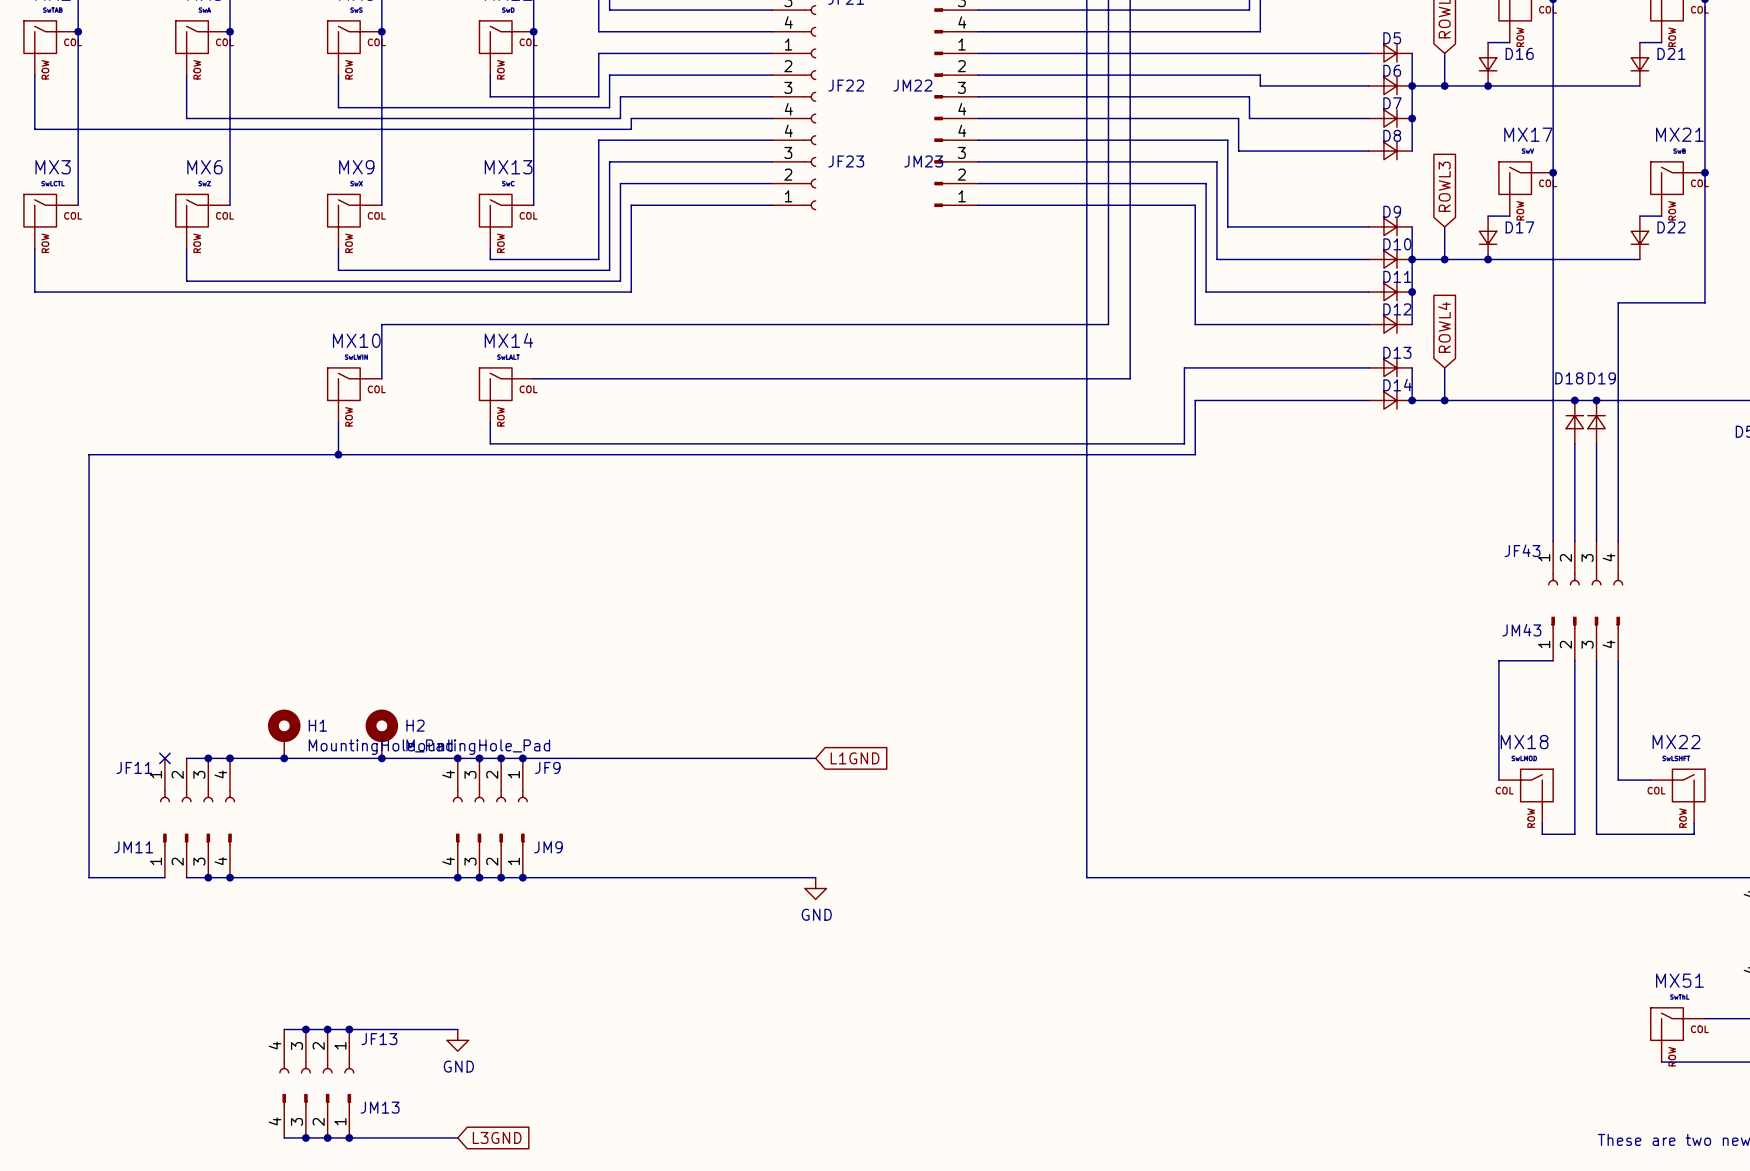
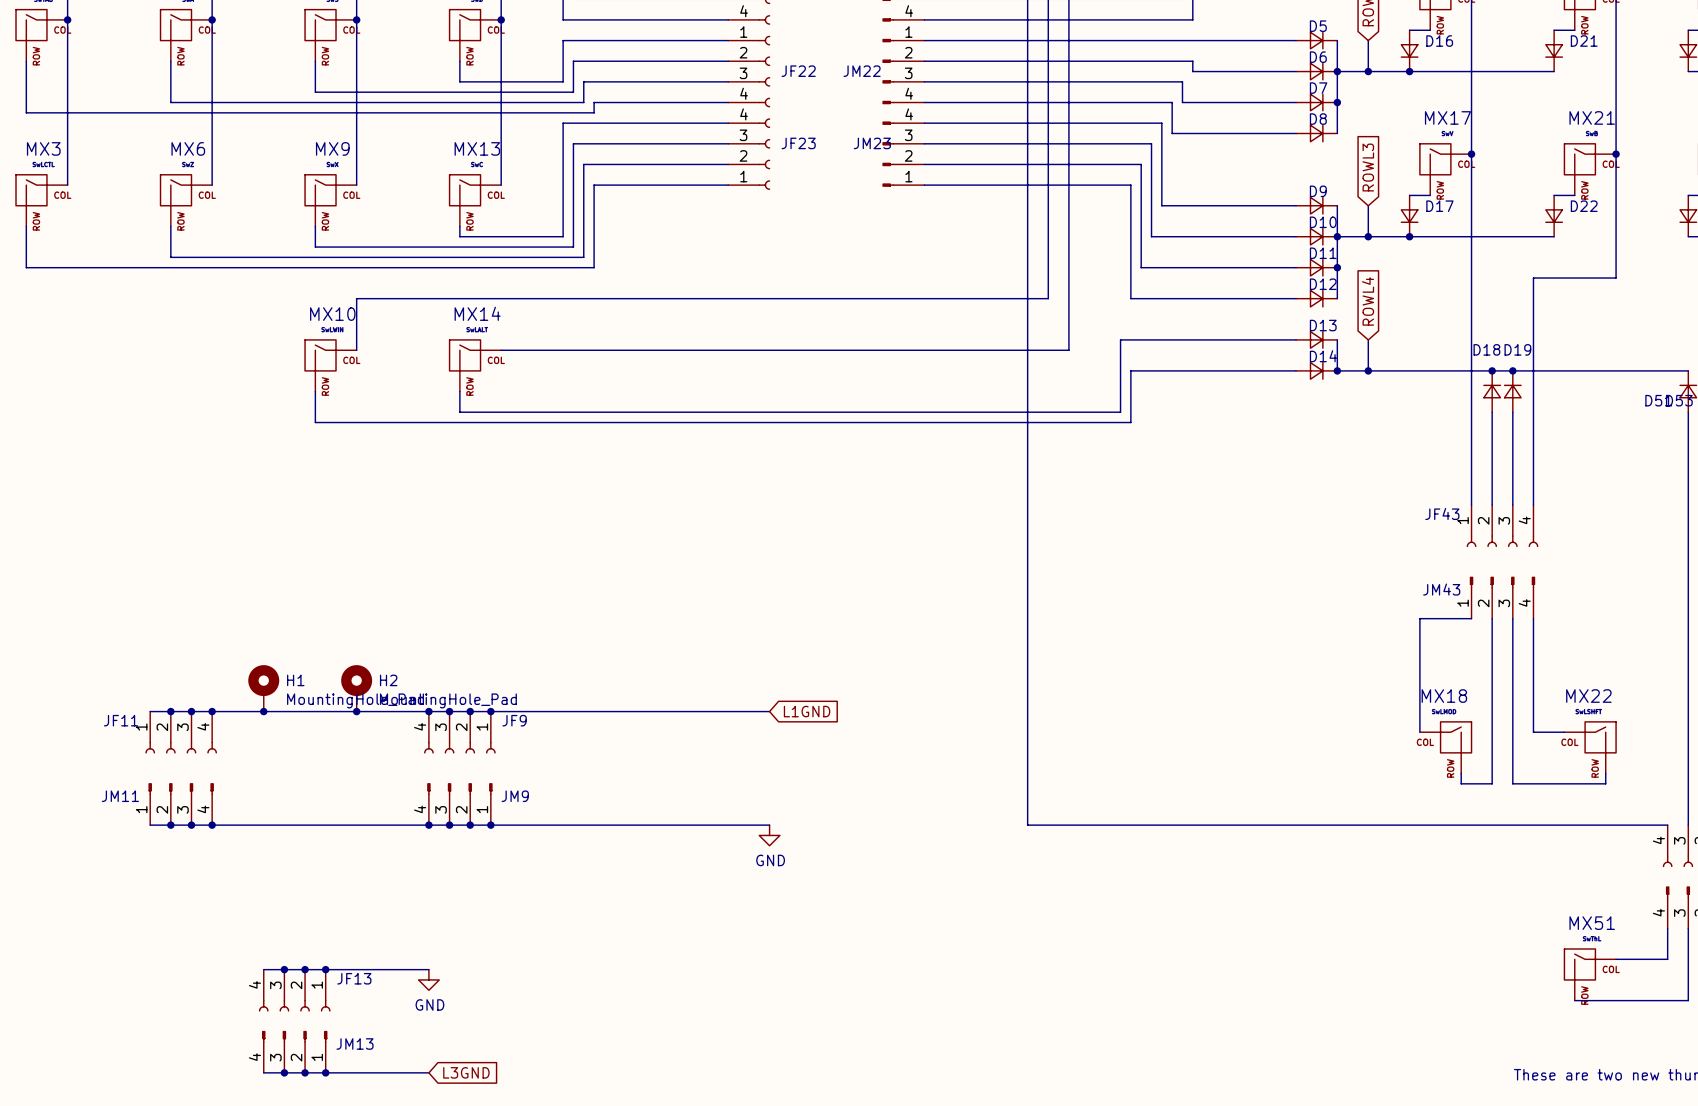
wire: (338, 454) (89, 454) (89, 877) (164, 877) -> (170, 825) (150, 825)
junction: (338, 454) -> none
wire: none -> (150, 711) (170, 711)
no-connect mark: (164, 758) -> none
junction: none -> (170, 711)
junction: none -> (170, 825)

